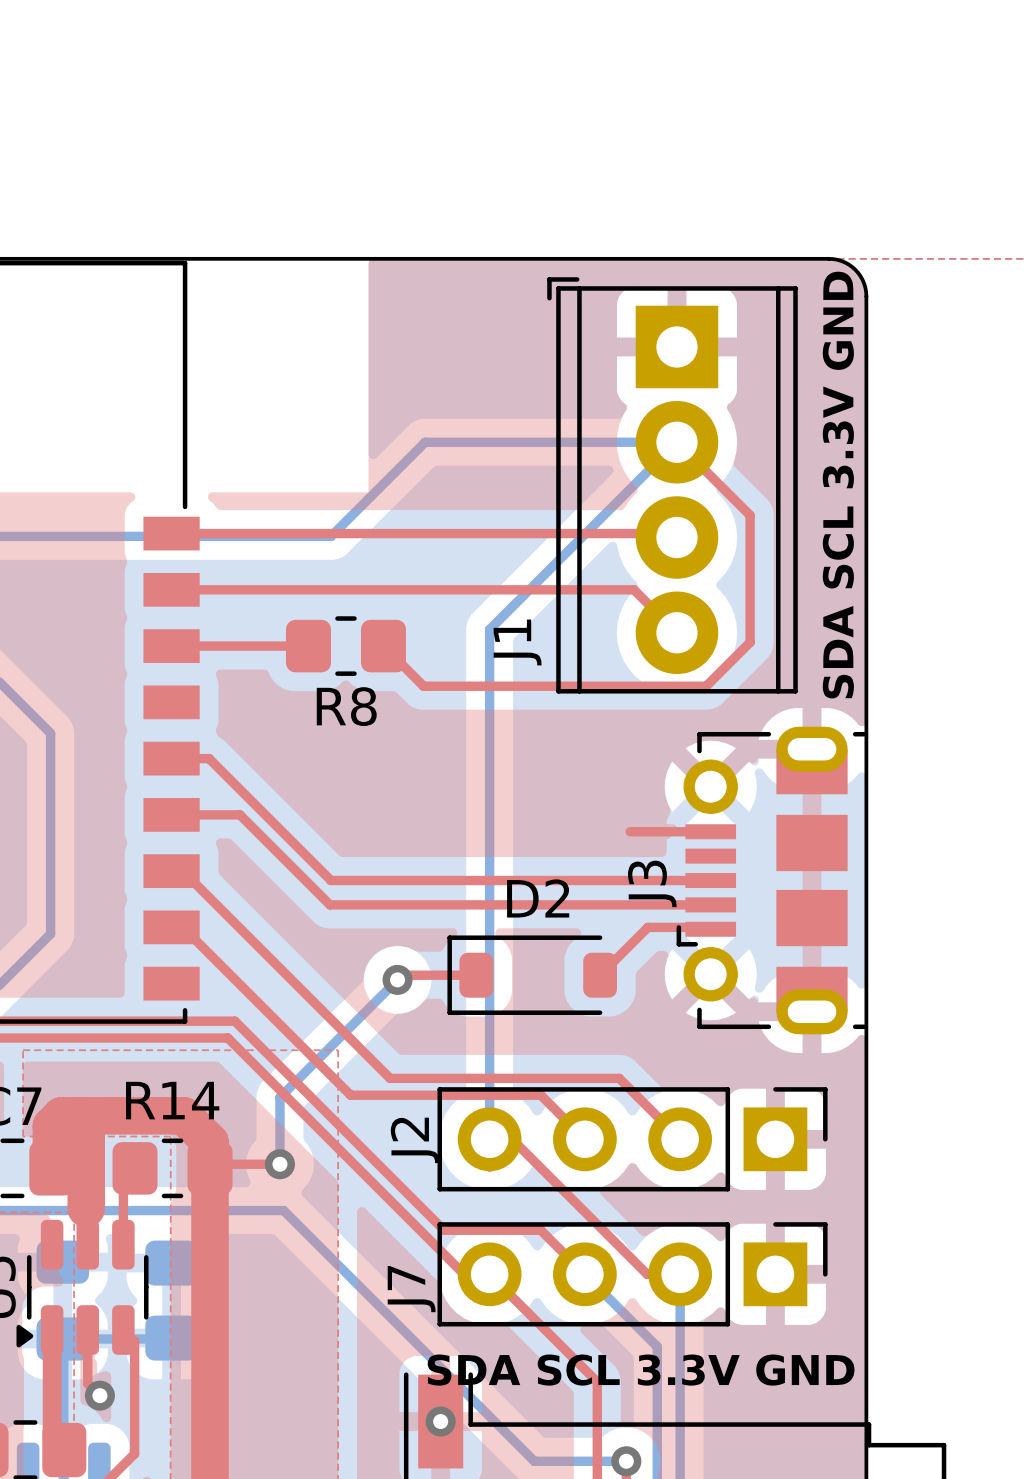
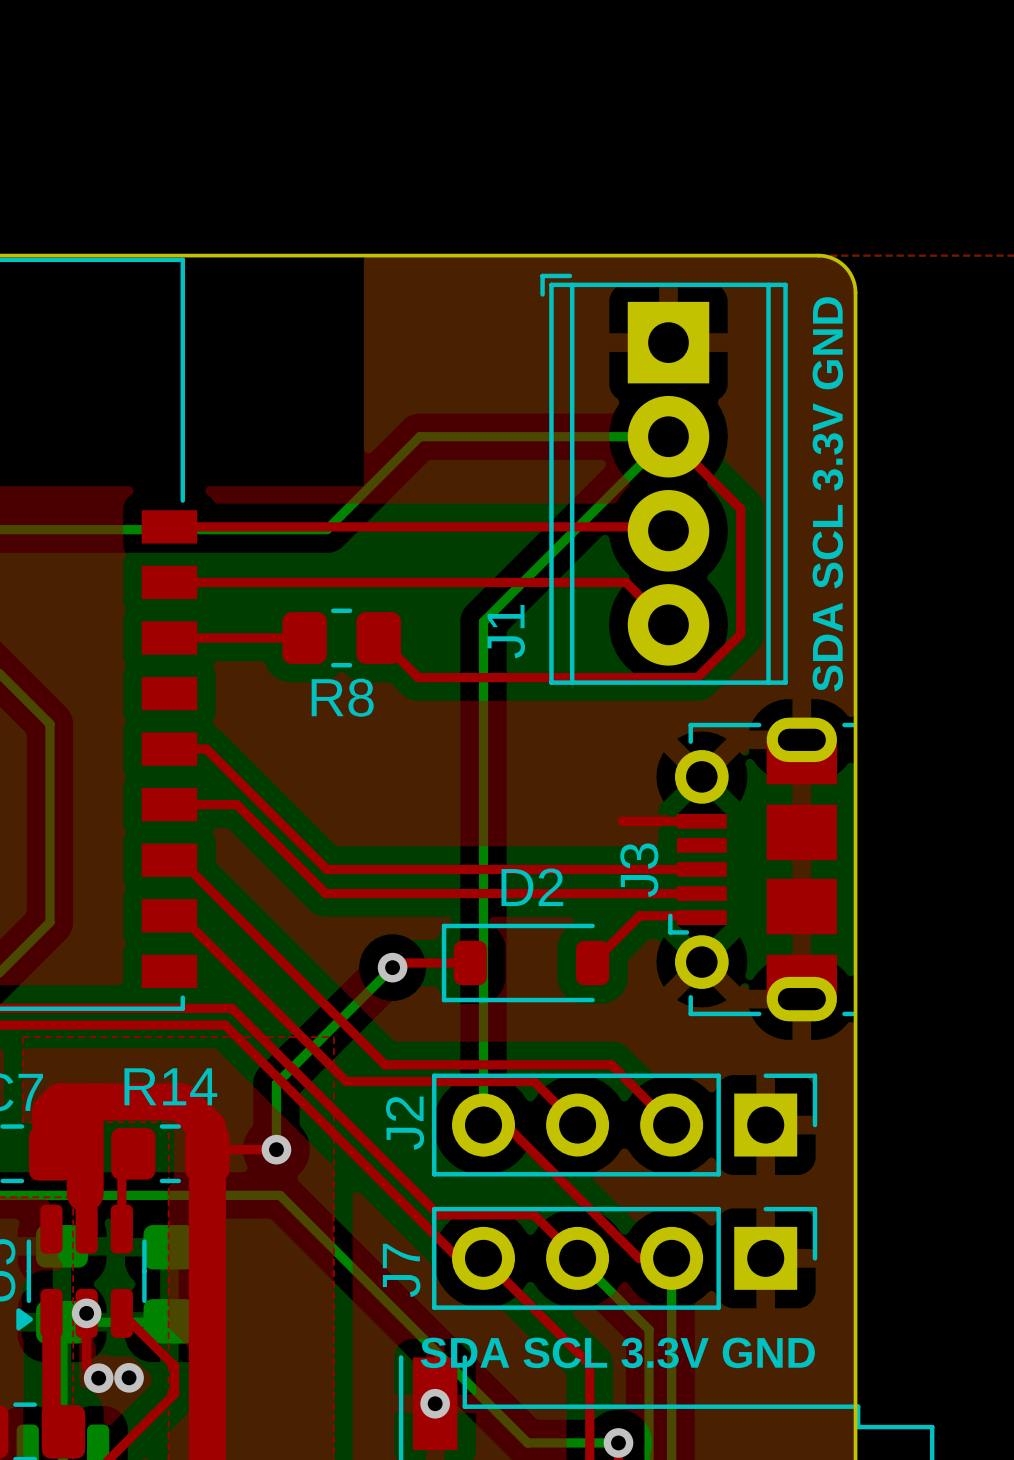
via: none -> (86, 1313)
top track: (134, 1341) (134, 1453) -> (132, 1324) (174, 1366) (174, 1393) (132, 1435)
via: none -> (129, 1377)

